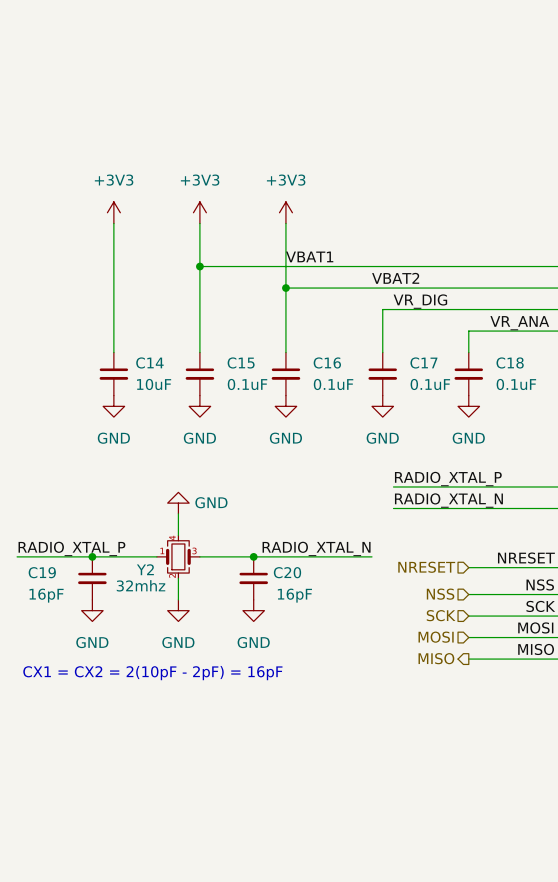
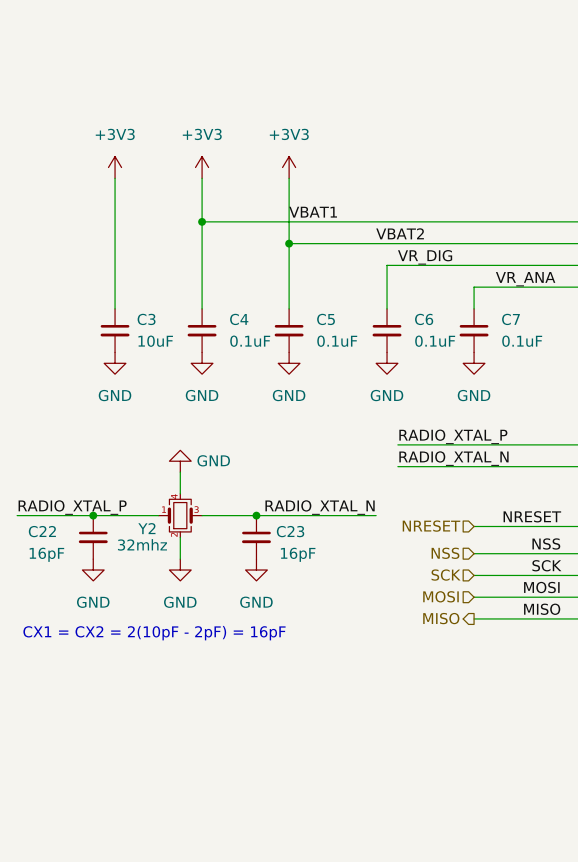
C14 name: C14 (149, 362) -> C3 (146, 319)
C15 name: C15 (241, 362) -> C4 (239, 319)
C16 name: C16 (327, 362) -> C5 (326, 319)
C17 name: C17 (423, 362) -> C6 (424, 319)
C18 name: C18 (510, 362) -> C7 (510, 319)
C19 name: C19 (42, 572) -> C22 (42, 531)
C20 name: C20 (287, 572) -> C23 (290, 531)

